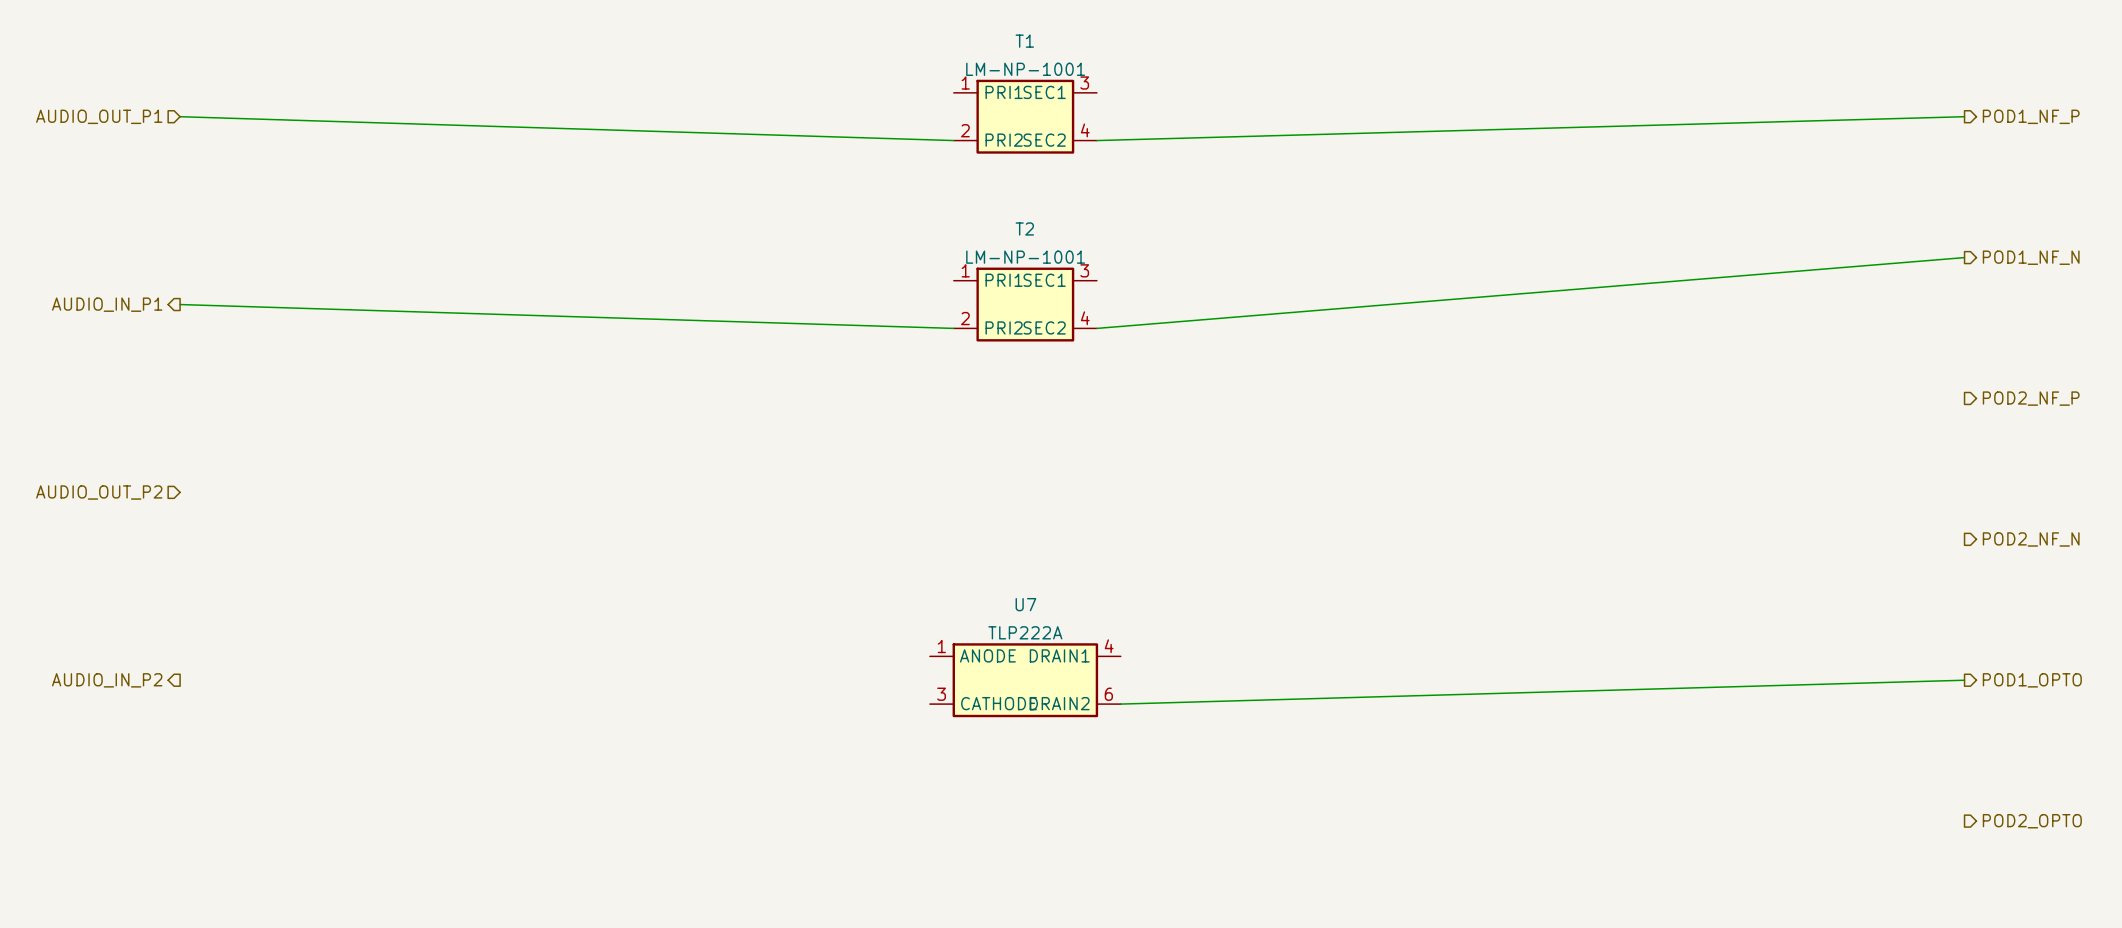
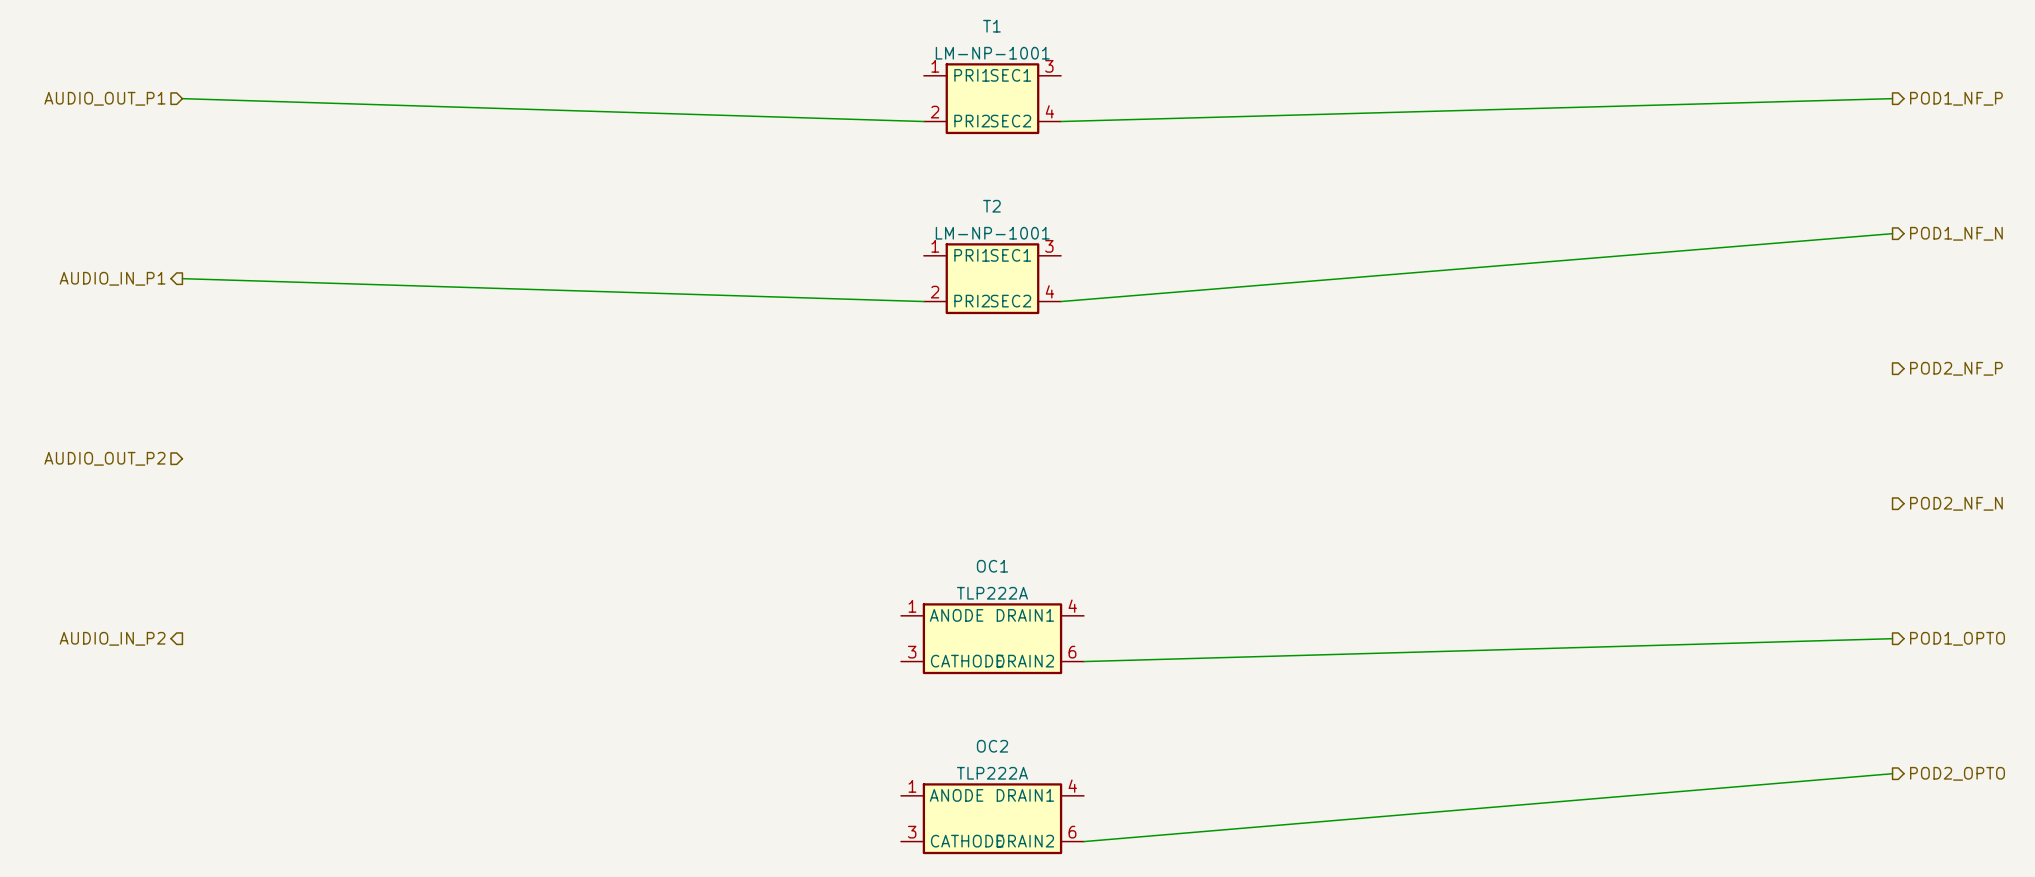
U7 name: U7 (1025, 604) -> OC1 (992, 566)
wire: none -> (1892, 773) (1083, 841)
OC2: none -> TLP222A (992, 818)

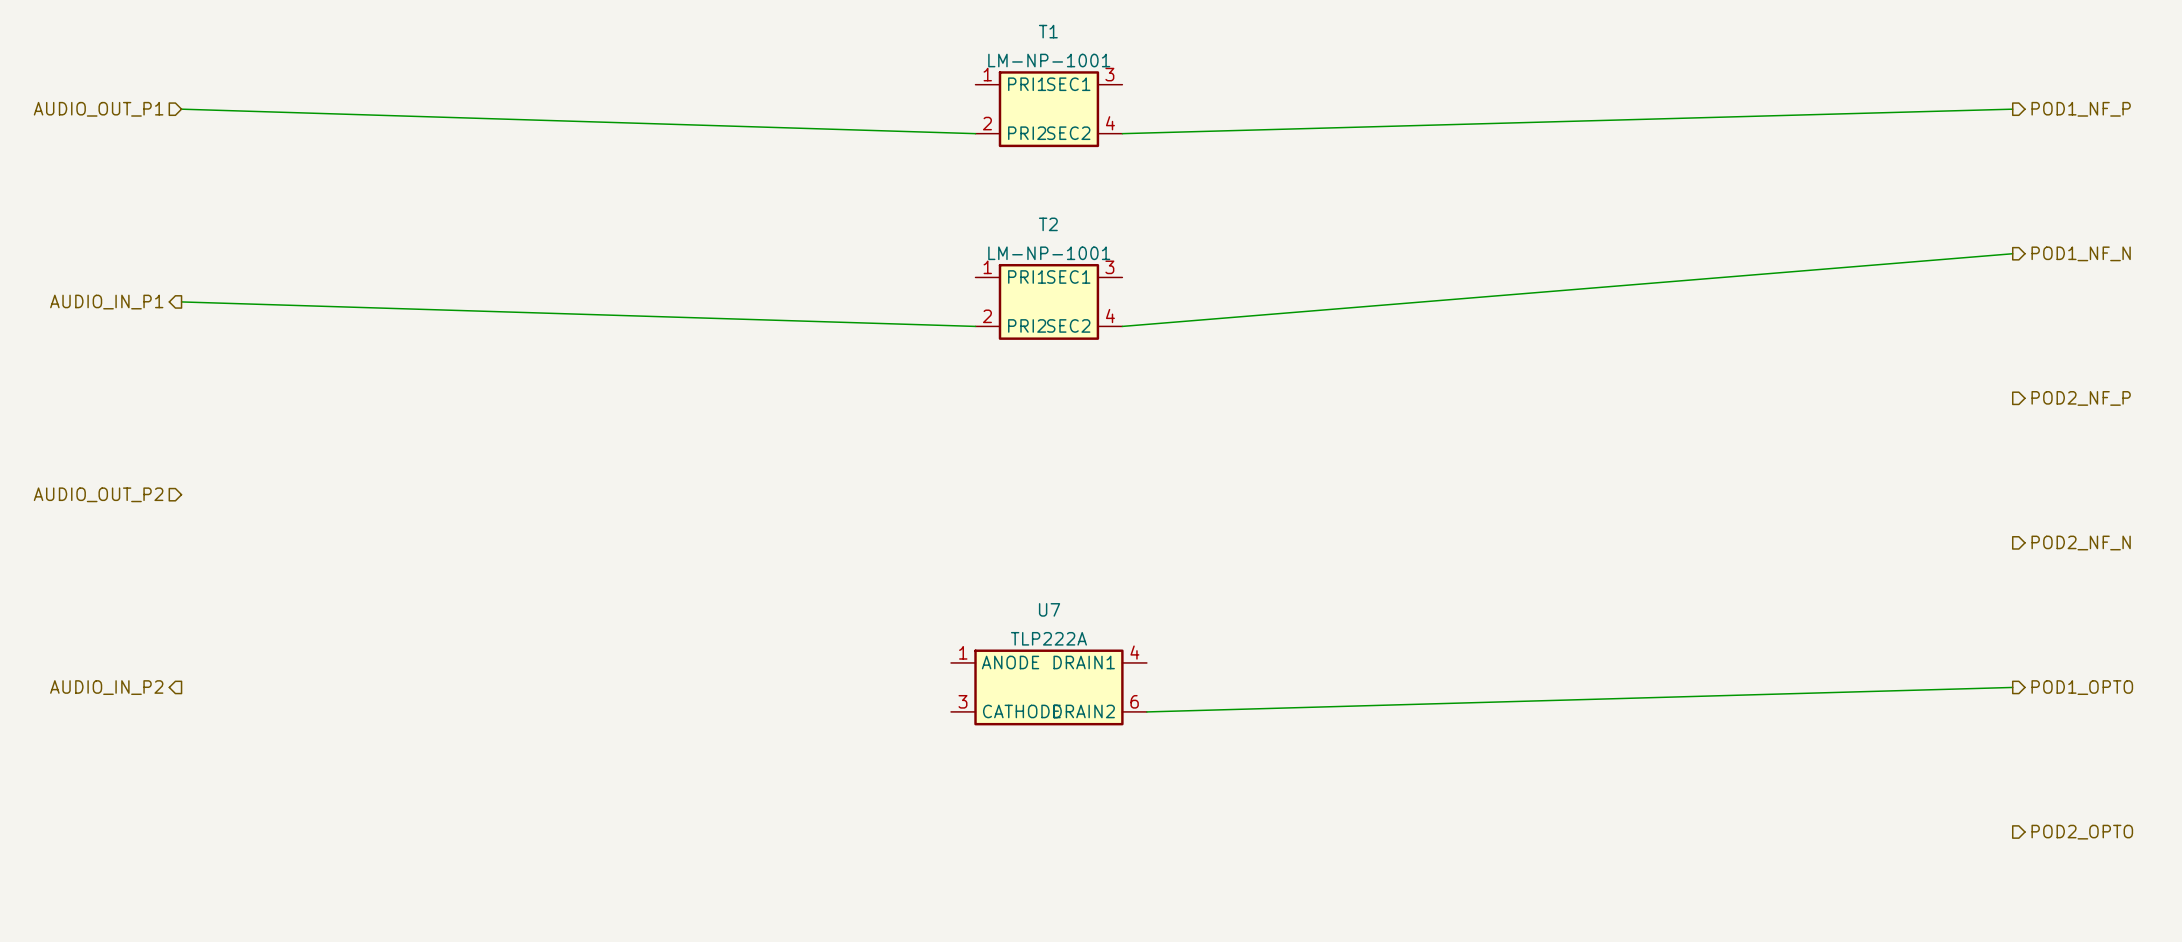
OC1 name: OC1 (992, 566) -> U7 (1049, 609)
wire: (1892, 773) (1083, 841) -> none
OC2: TLP222A (992, 818) -> none

